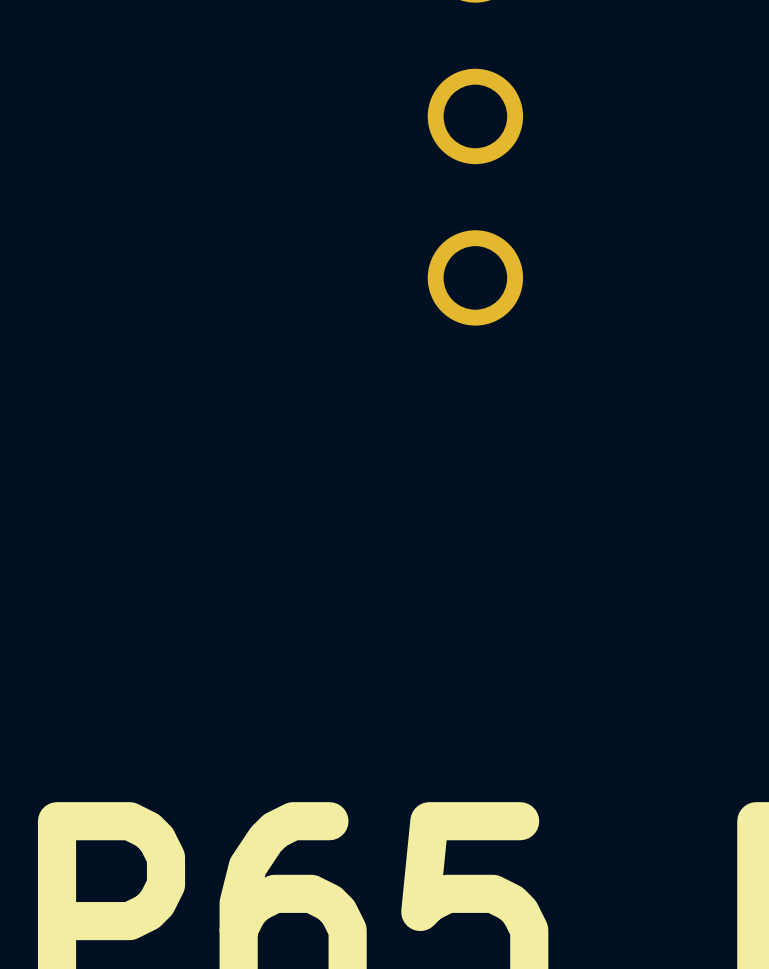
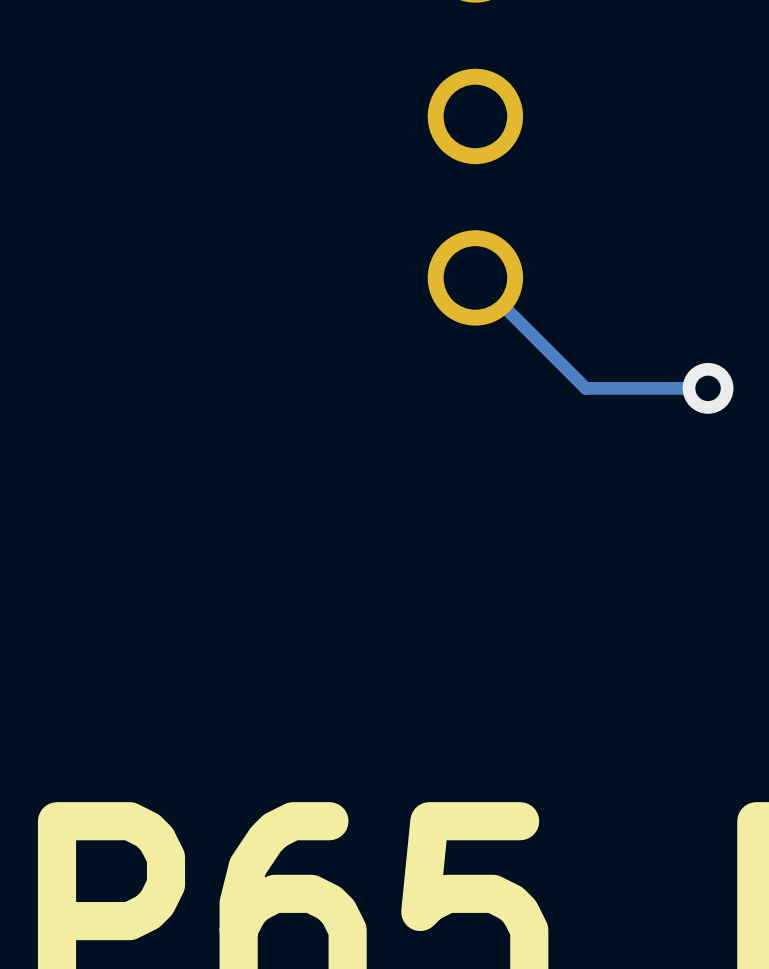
track: none -> (475, 277) (585, 388) (708, 388)
via: none -> (708, 388)

